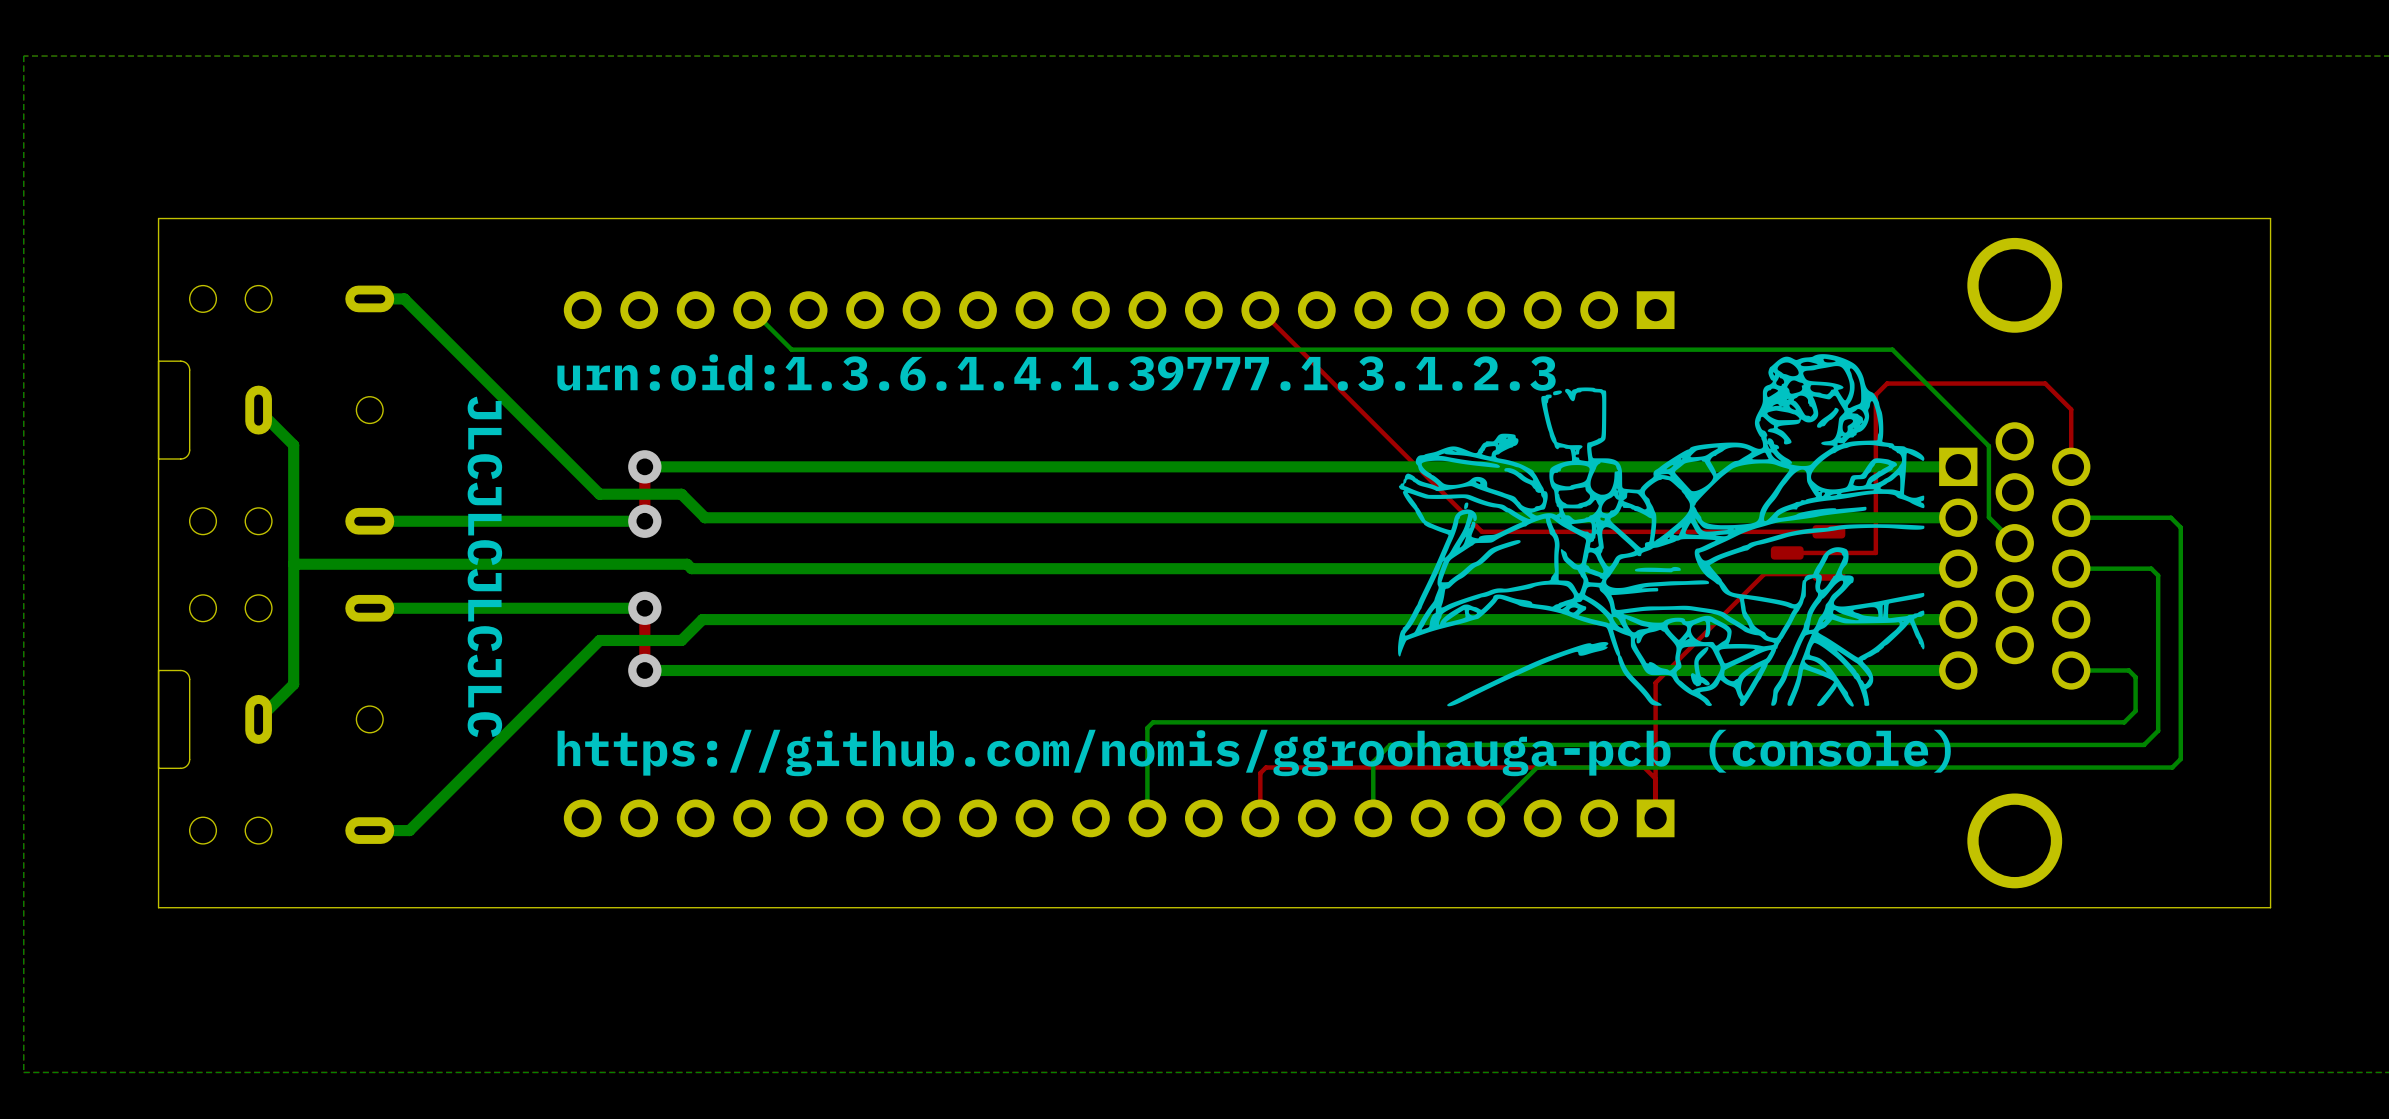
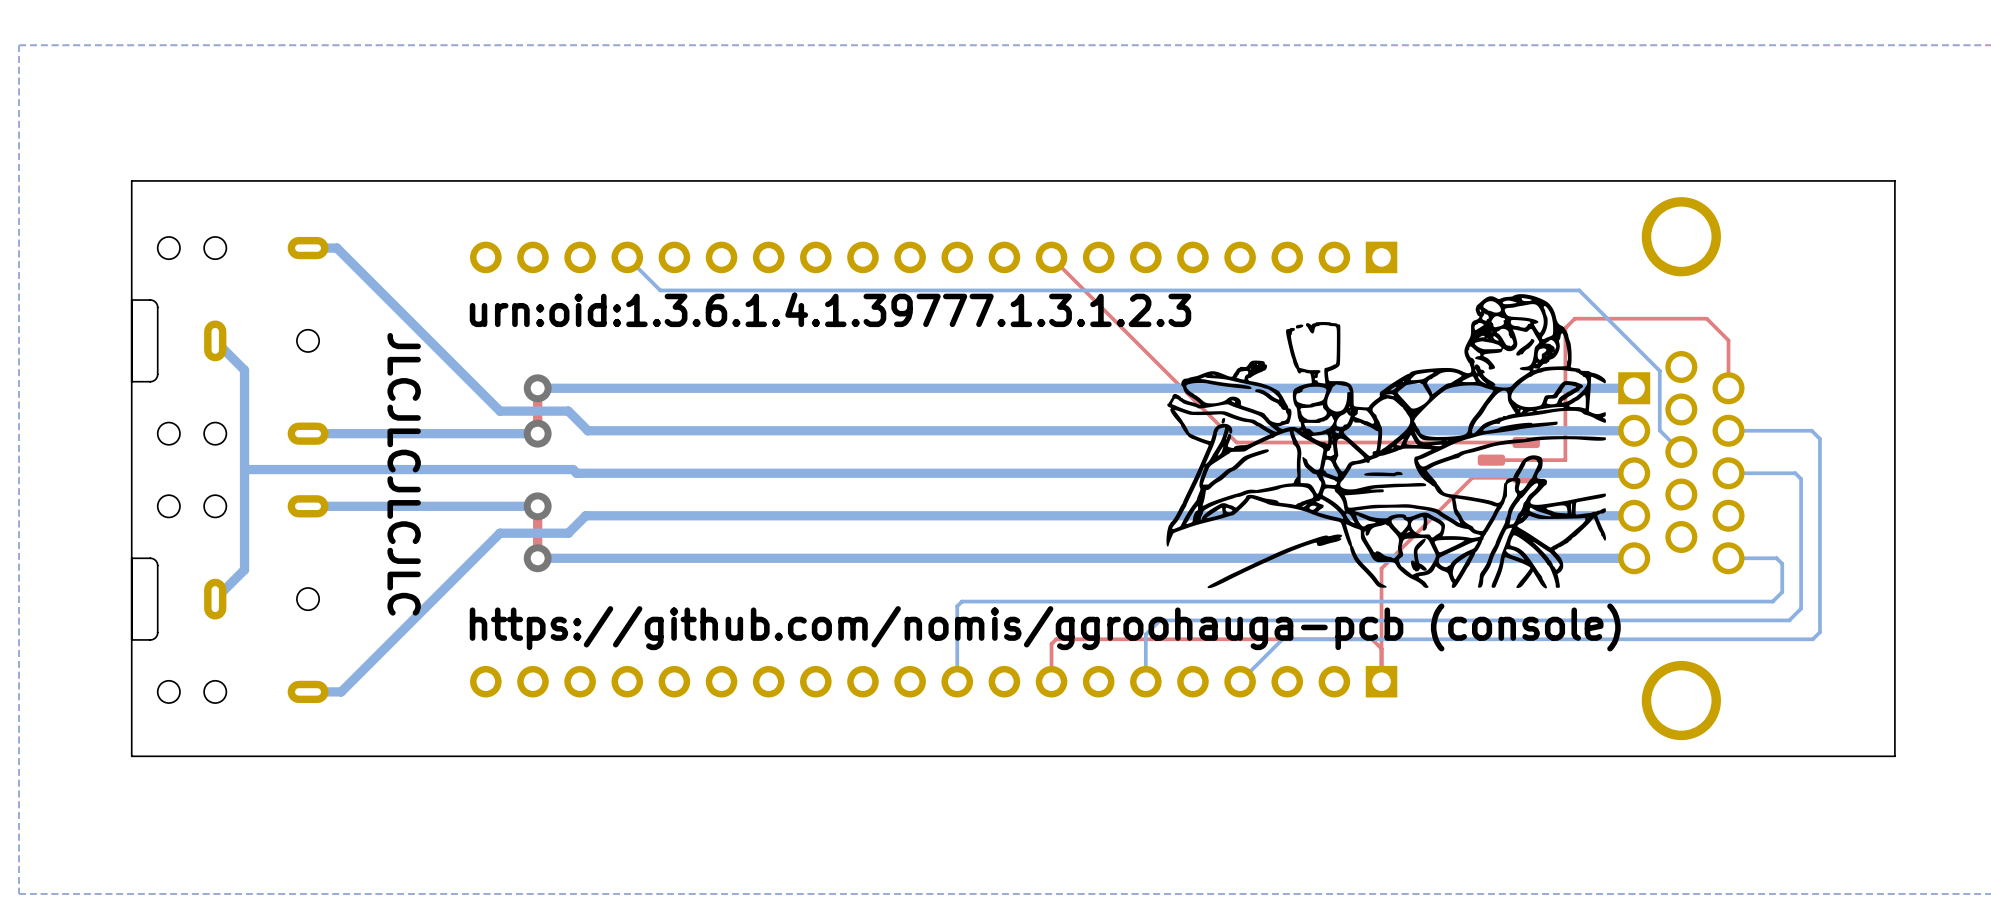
drawing shape: [1398, 354, 1925, 707] -> [1166, 294, 1607, 589]

